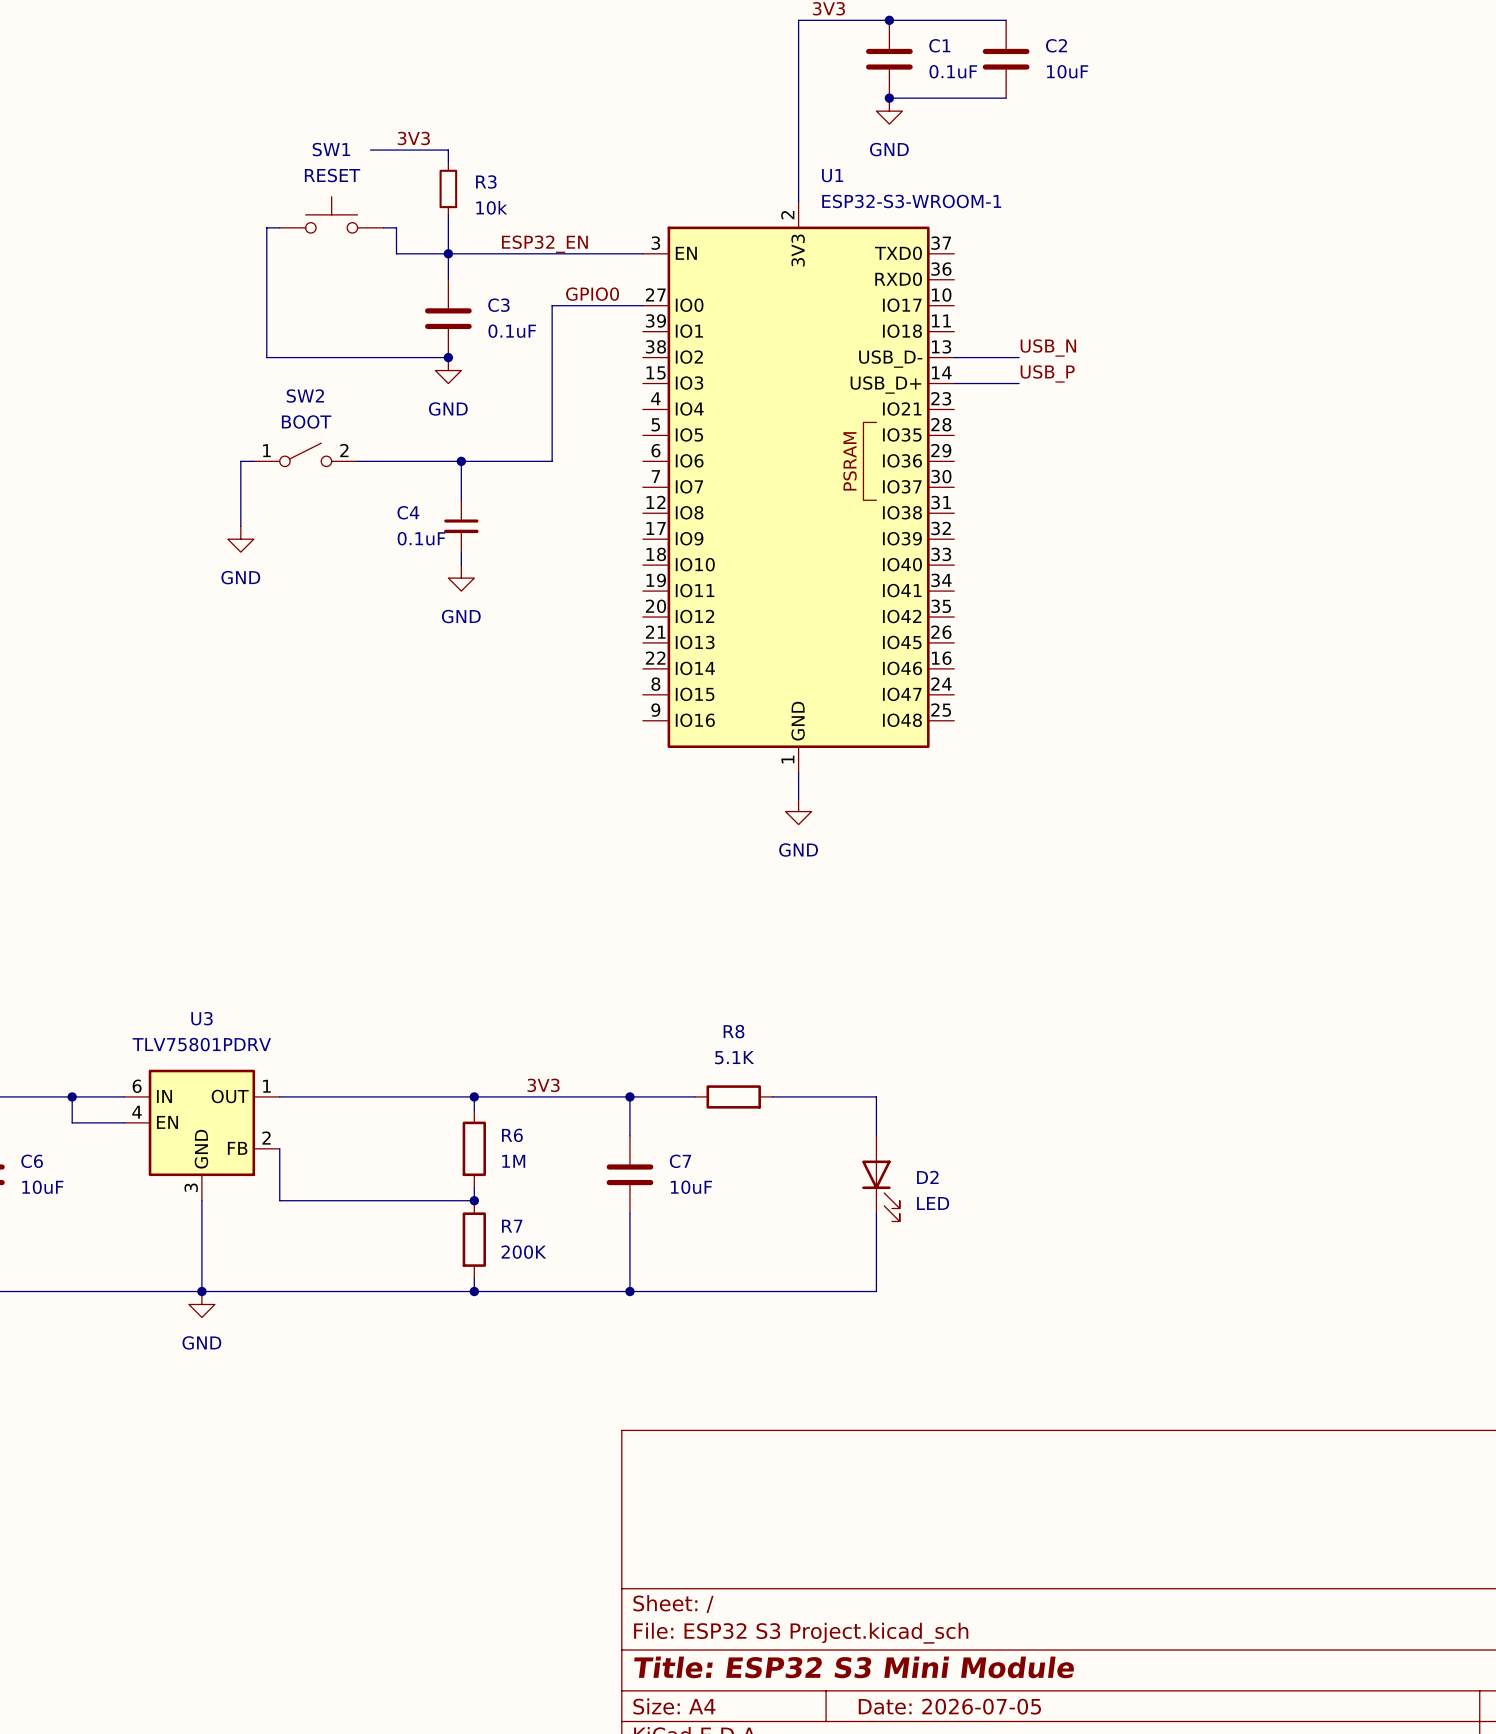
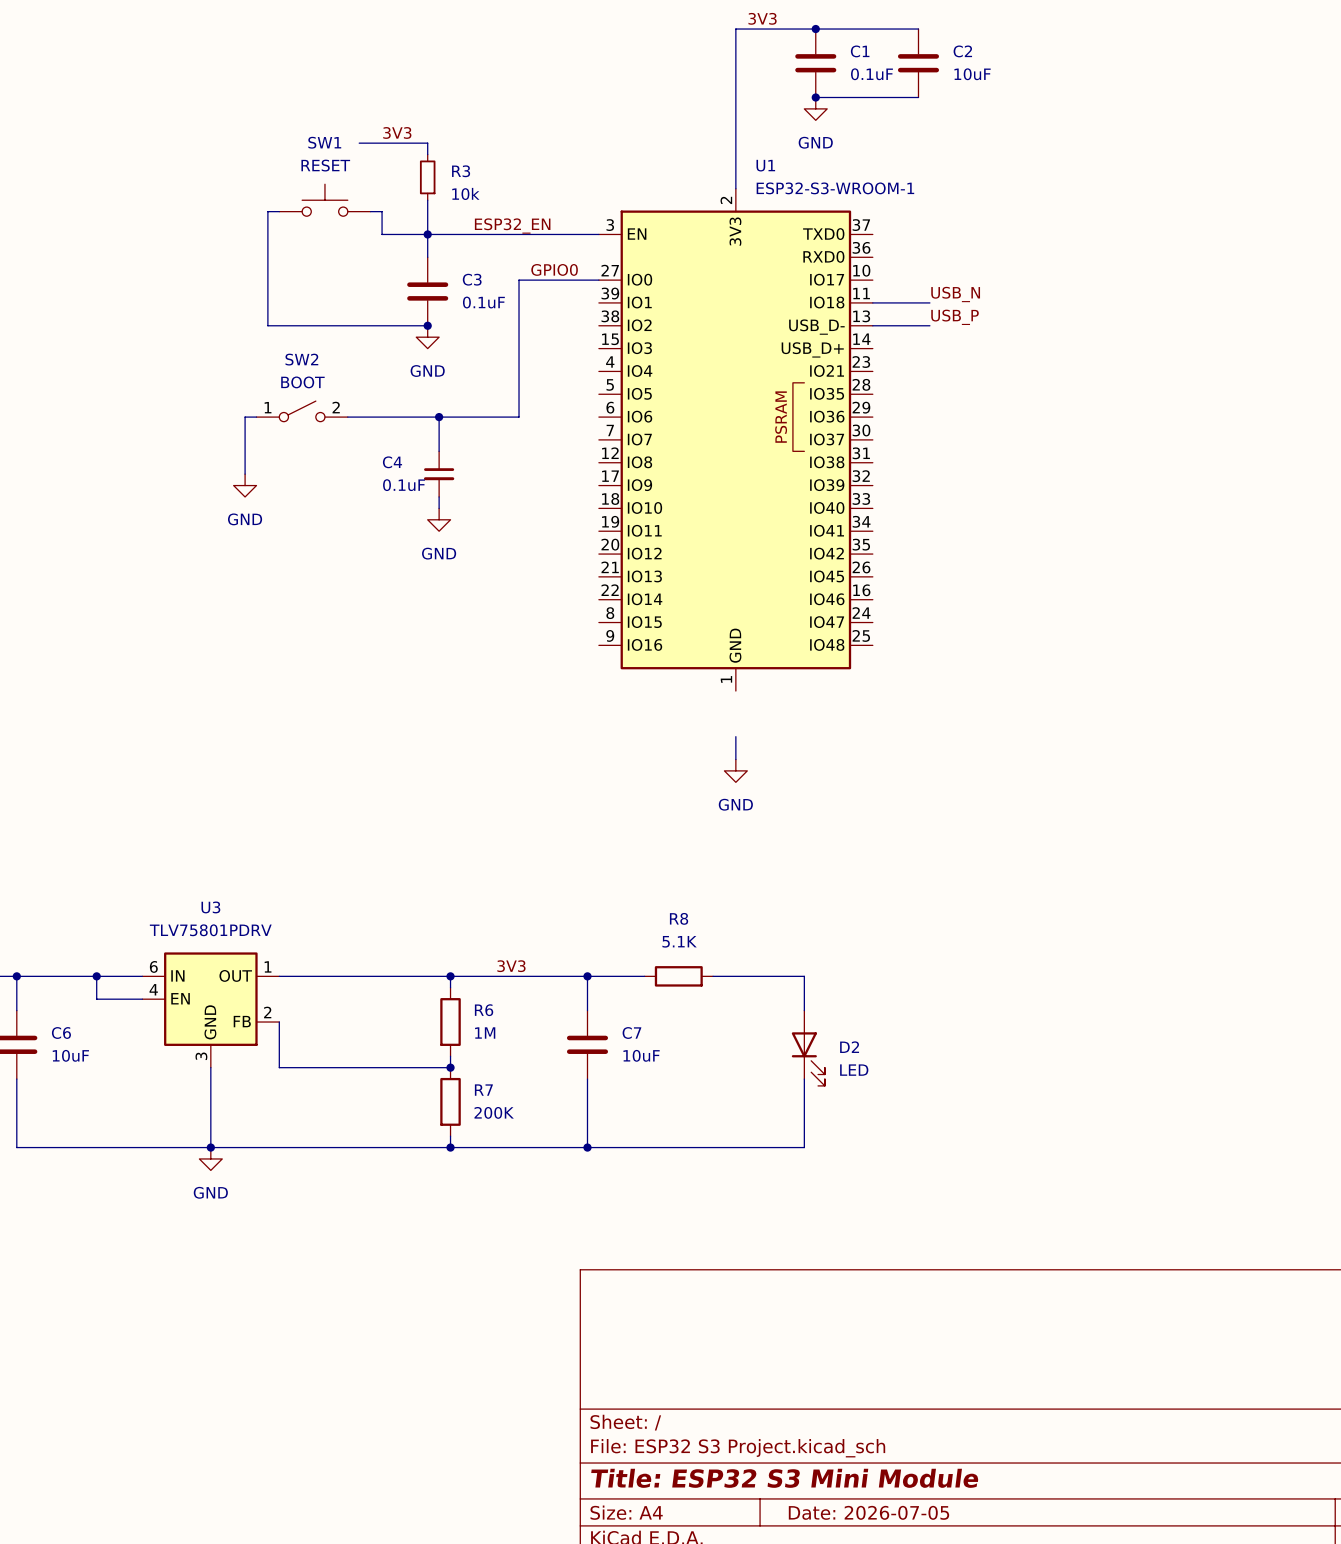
label: none -> USB_N (955, 294)
label: USB_N (1048, 347) -> USB_P (955, 317)
label: USB_P (1047, 373) -> none
wire: (954, 383) (1019, 383) -> (872, 302) (929, 302)
wire: (798, 772) (798, 798) -> (735, 736) (735, 759)
power symbol position: GND (798, 811) -> GND (735, 770)

